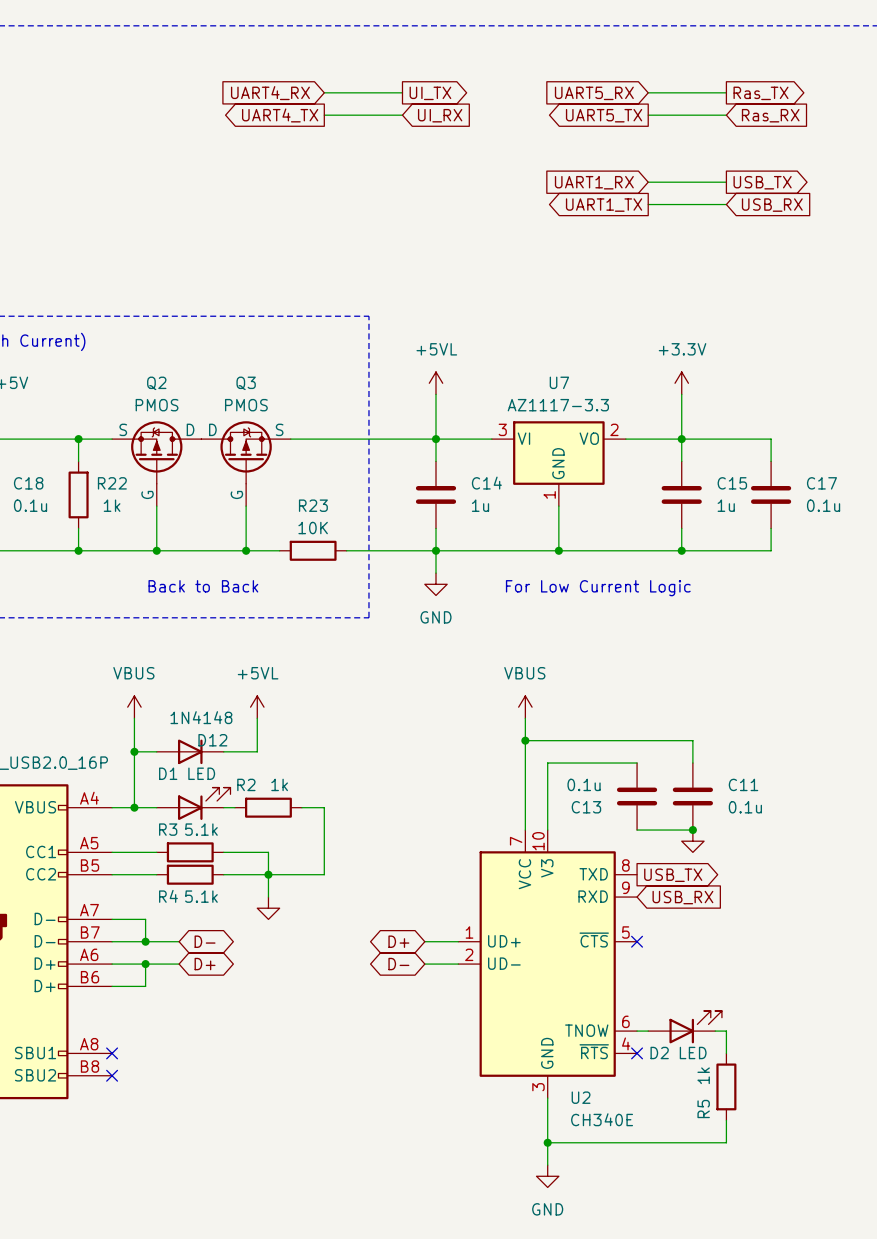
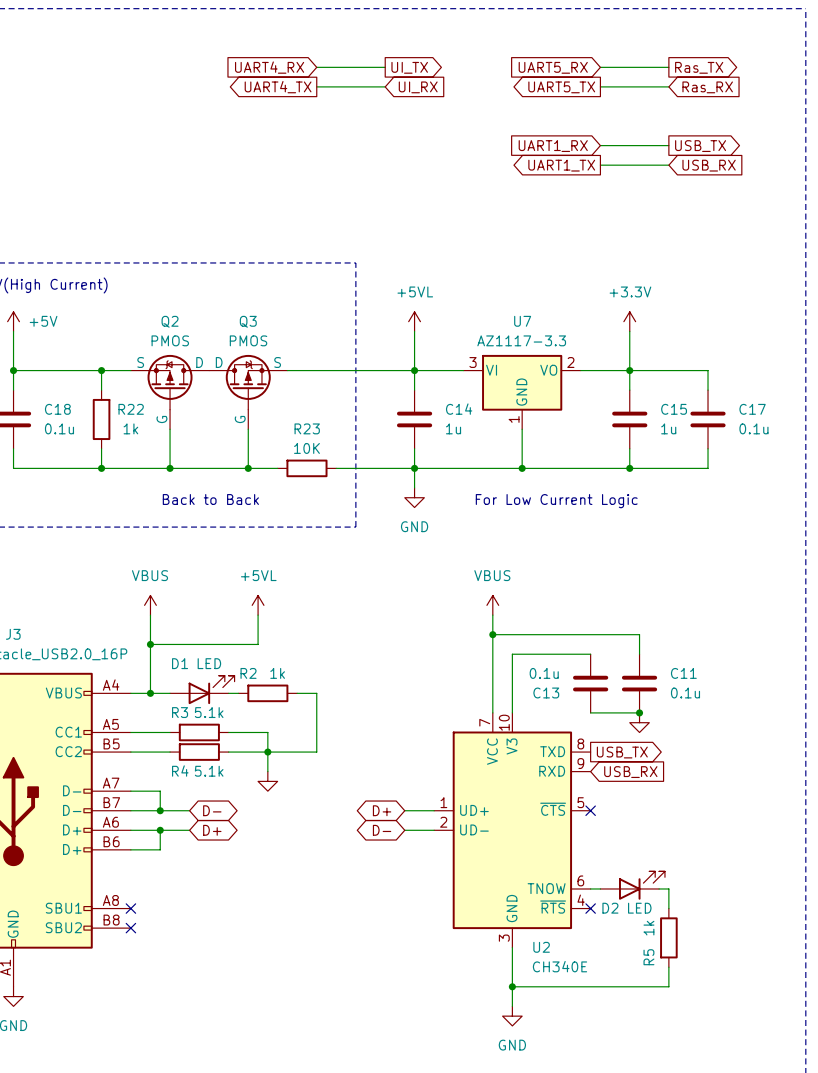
D12: 1N4148 (190, 751) -> none

